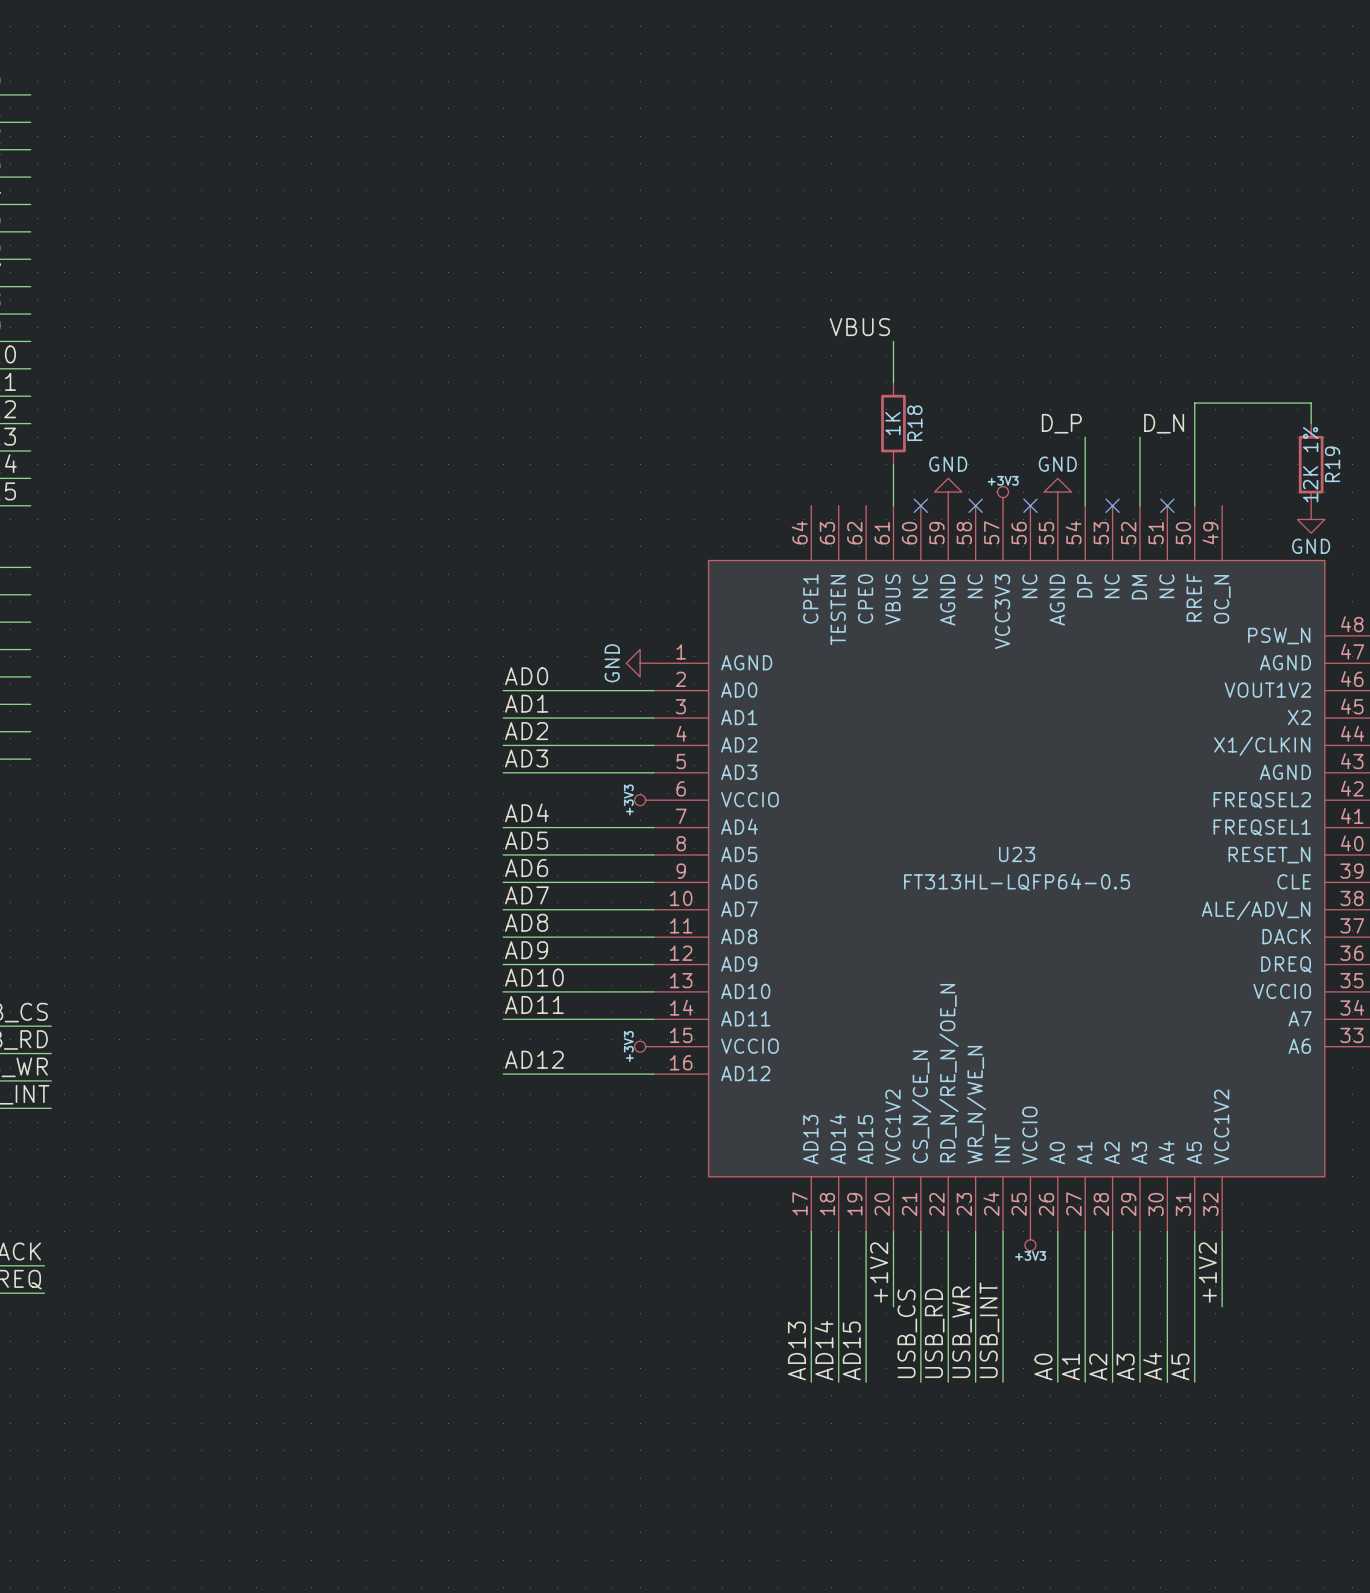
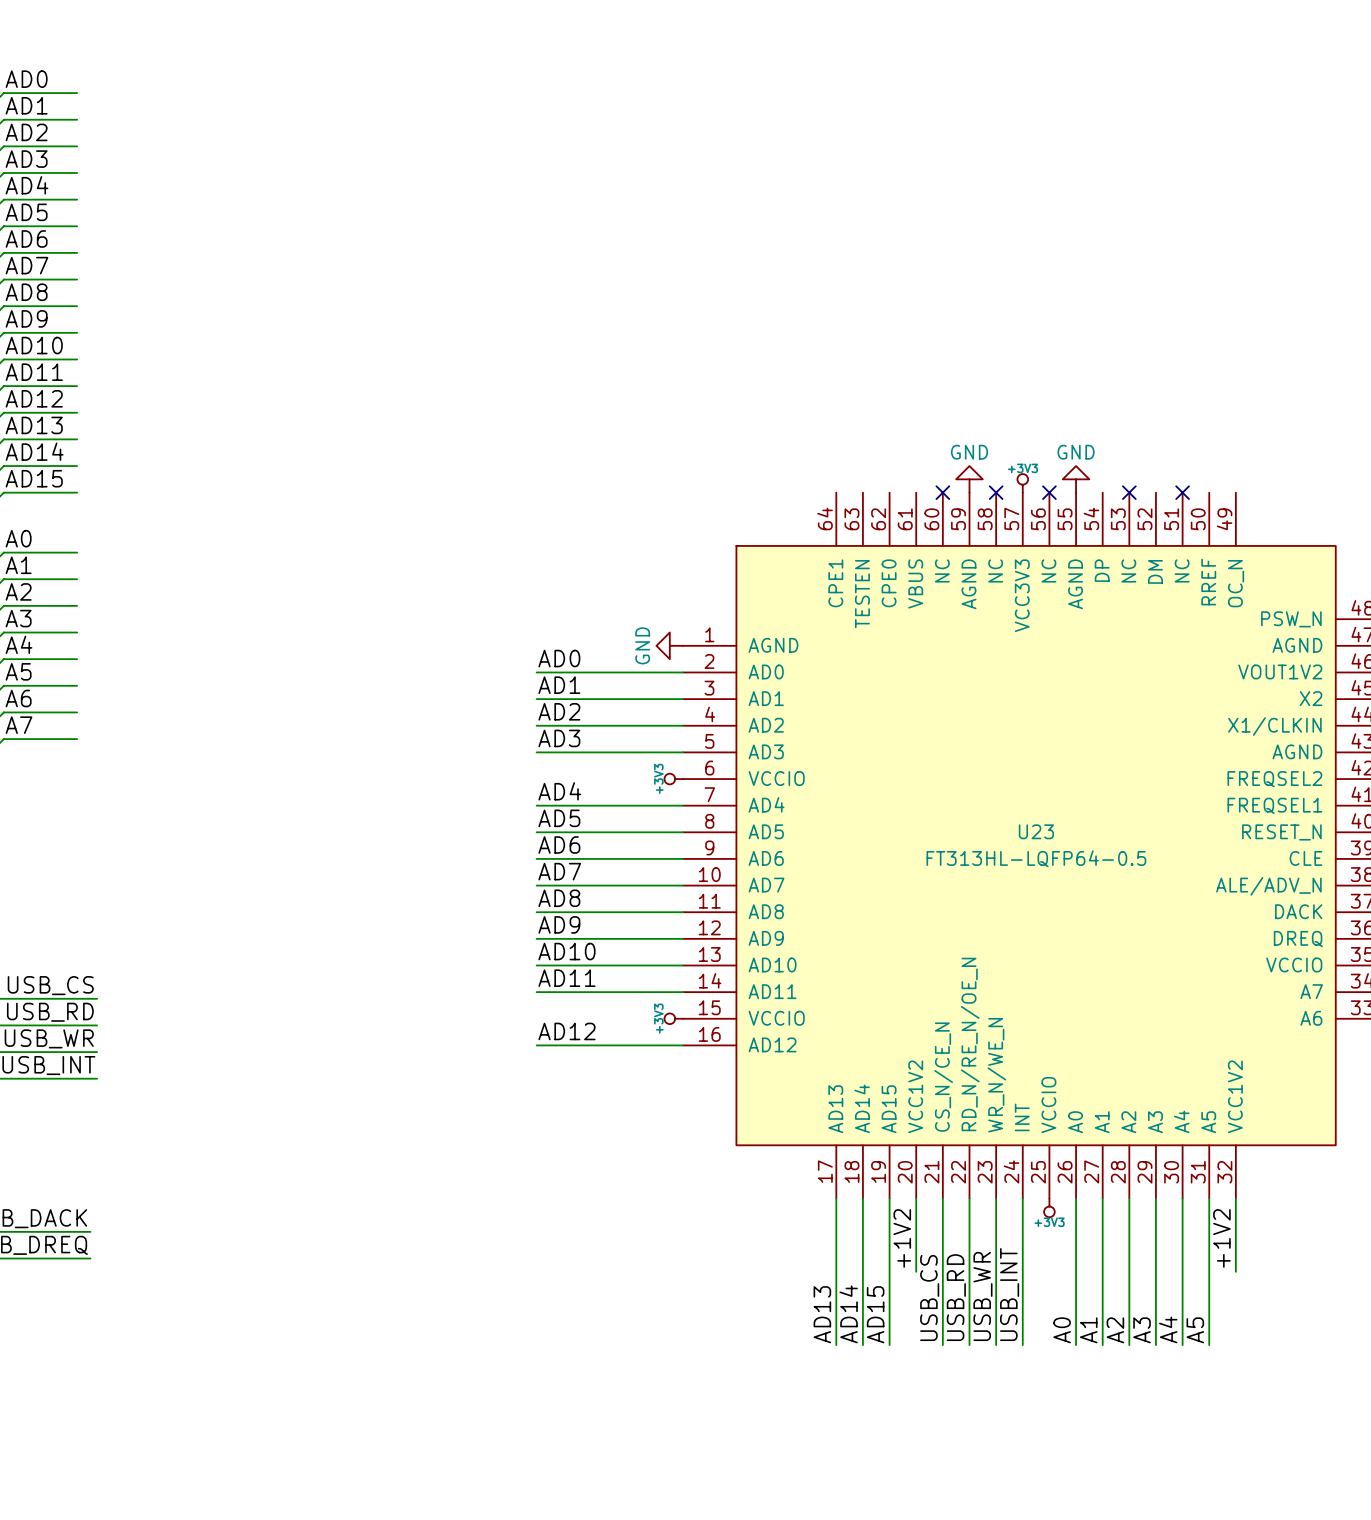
label: VBUS (859, 327) -> none
wire: (893, 341) (893, 382) -> none
R18: 1K (893, 423) -> none
label: D_P (1061, 423) -> none
label: D_N (1164, 423) -> none
wire: (1311, 423) (1311, 403) (1194, 403) (1194, 505) -> none
wire: (1085, 437) (1085, 505) -> none
wire: (1139, 437) (1139, 505) -> none
wire: (893, 464) (893, 505) -> none
R19: 12K 1% (1311, 464) -> none
power symbol: GND (1311, 519) -> none

